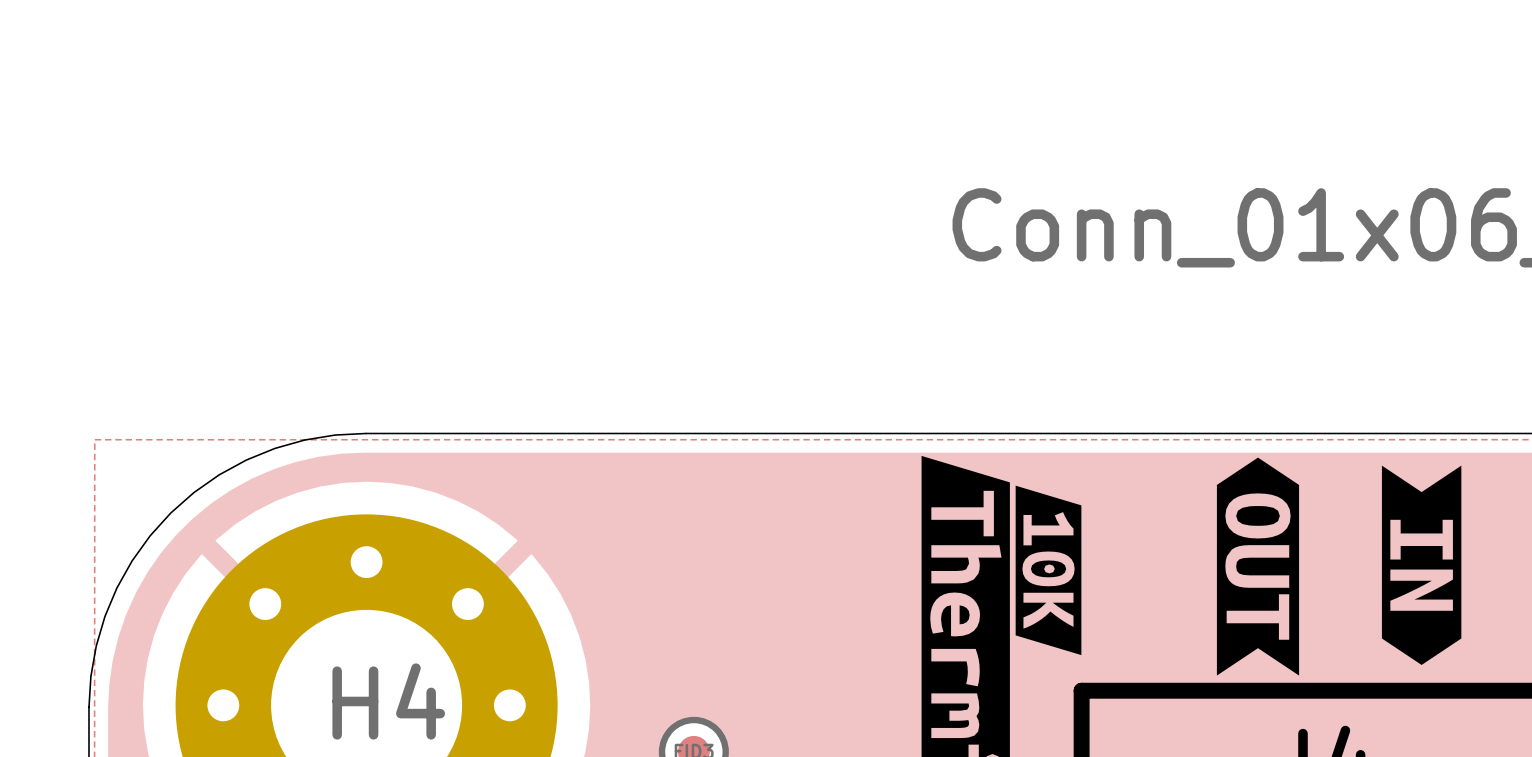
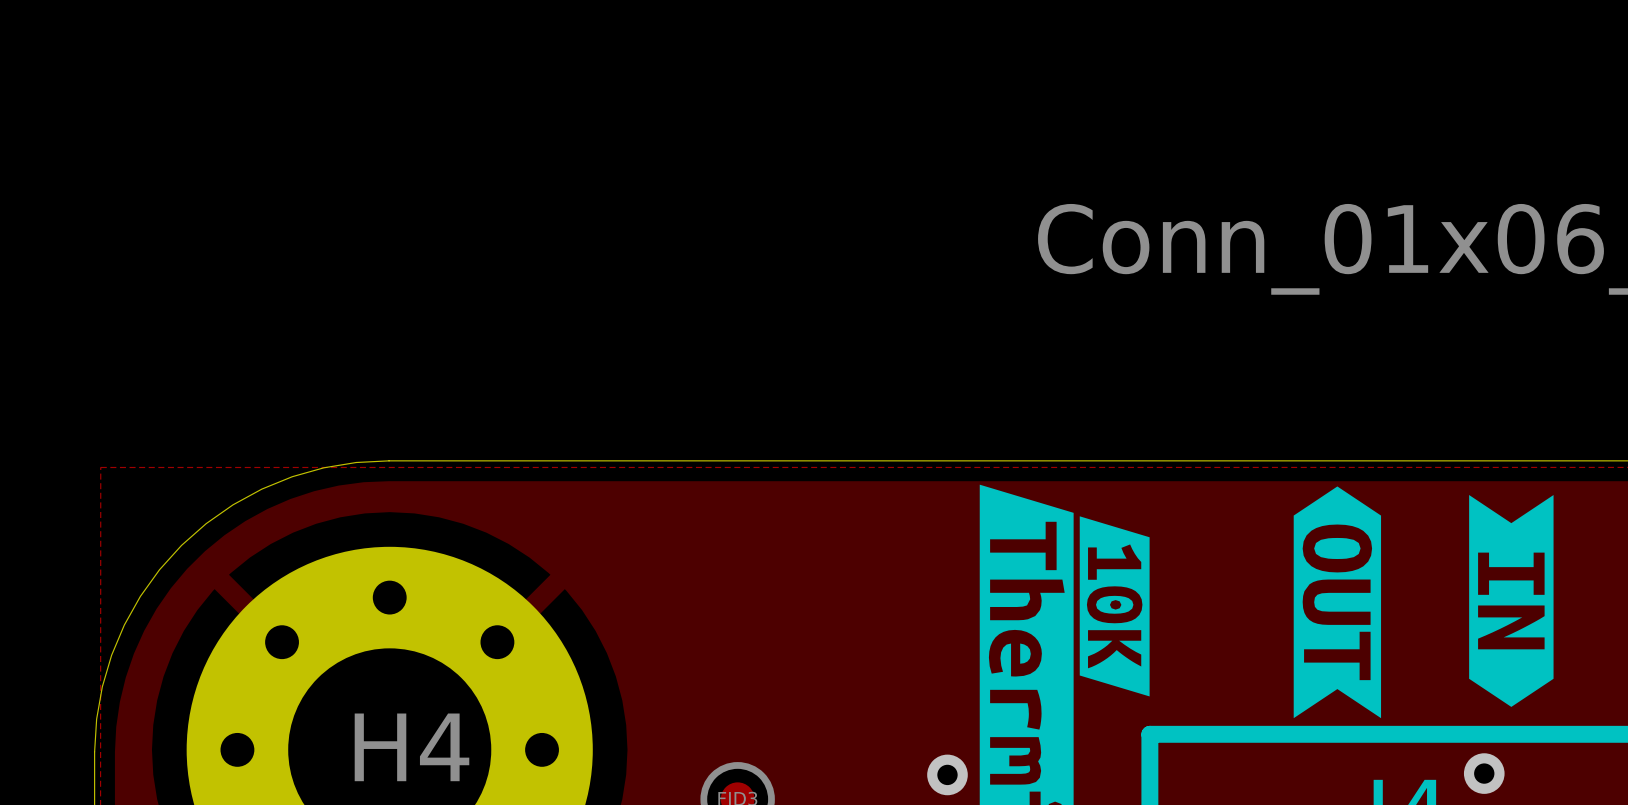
via: none -> (1484, 773)
via: none -> (947, 774)

